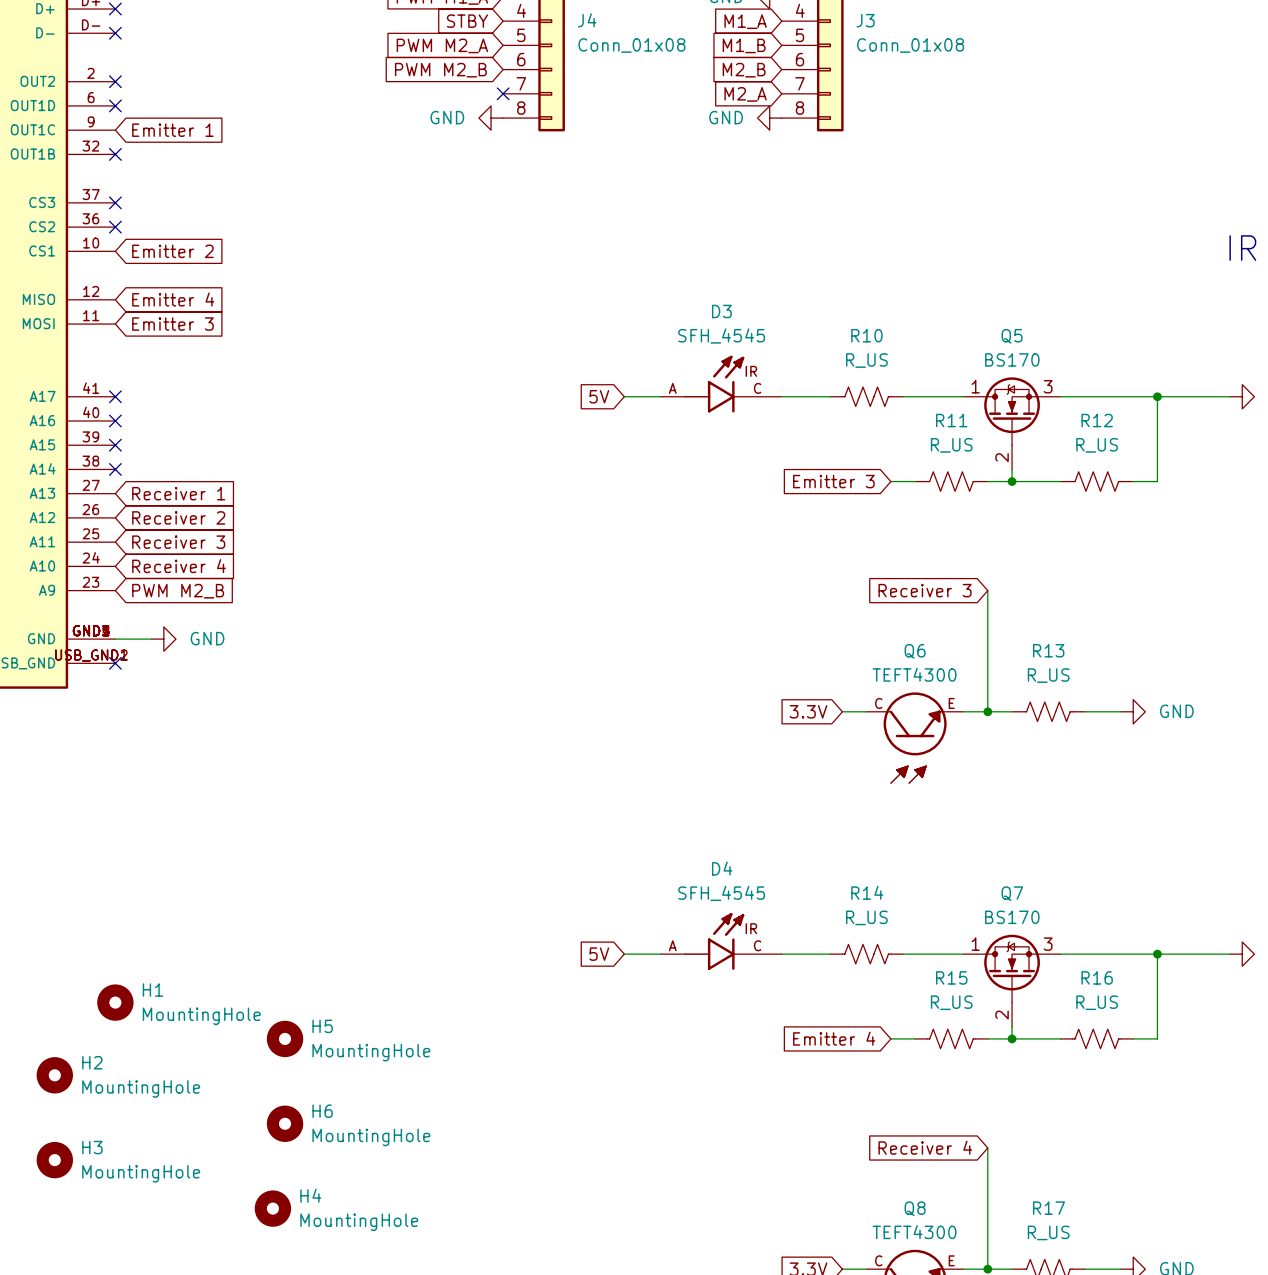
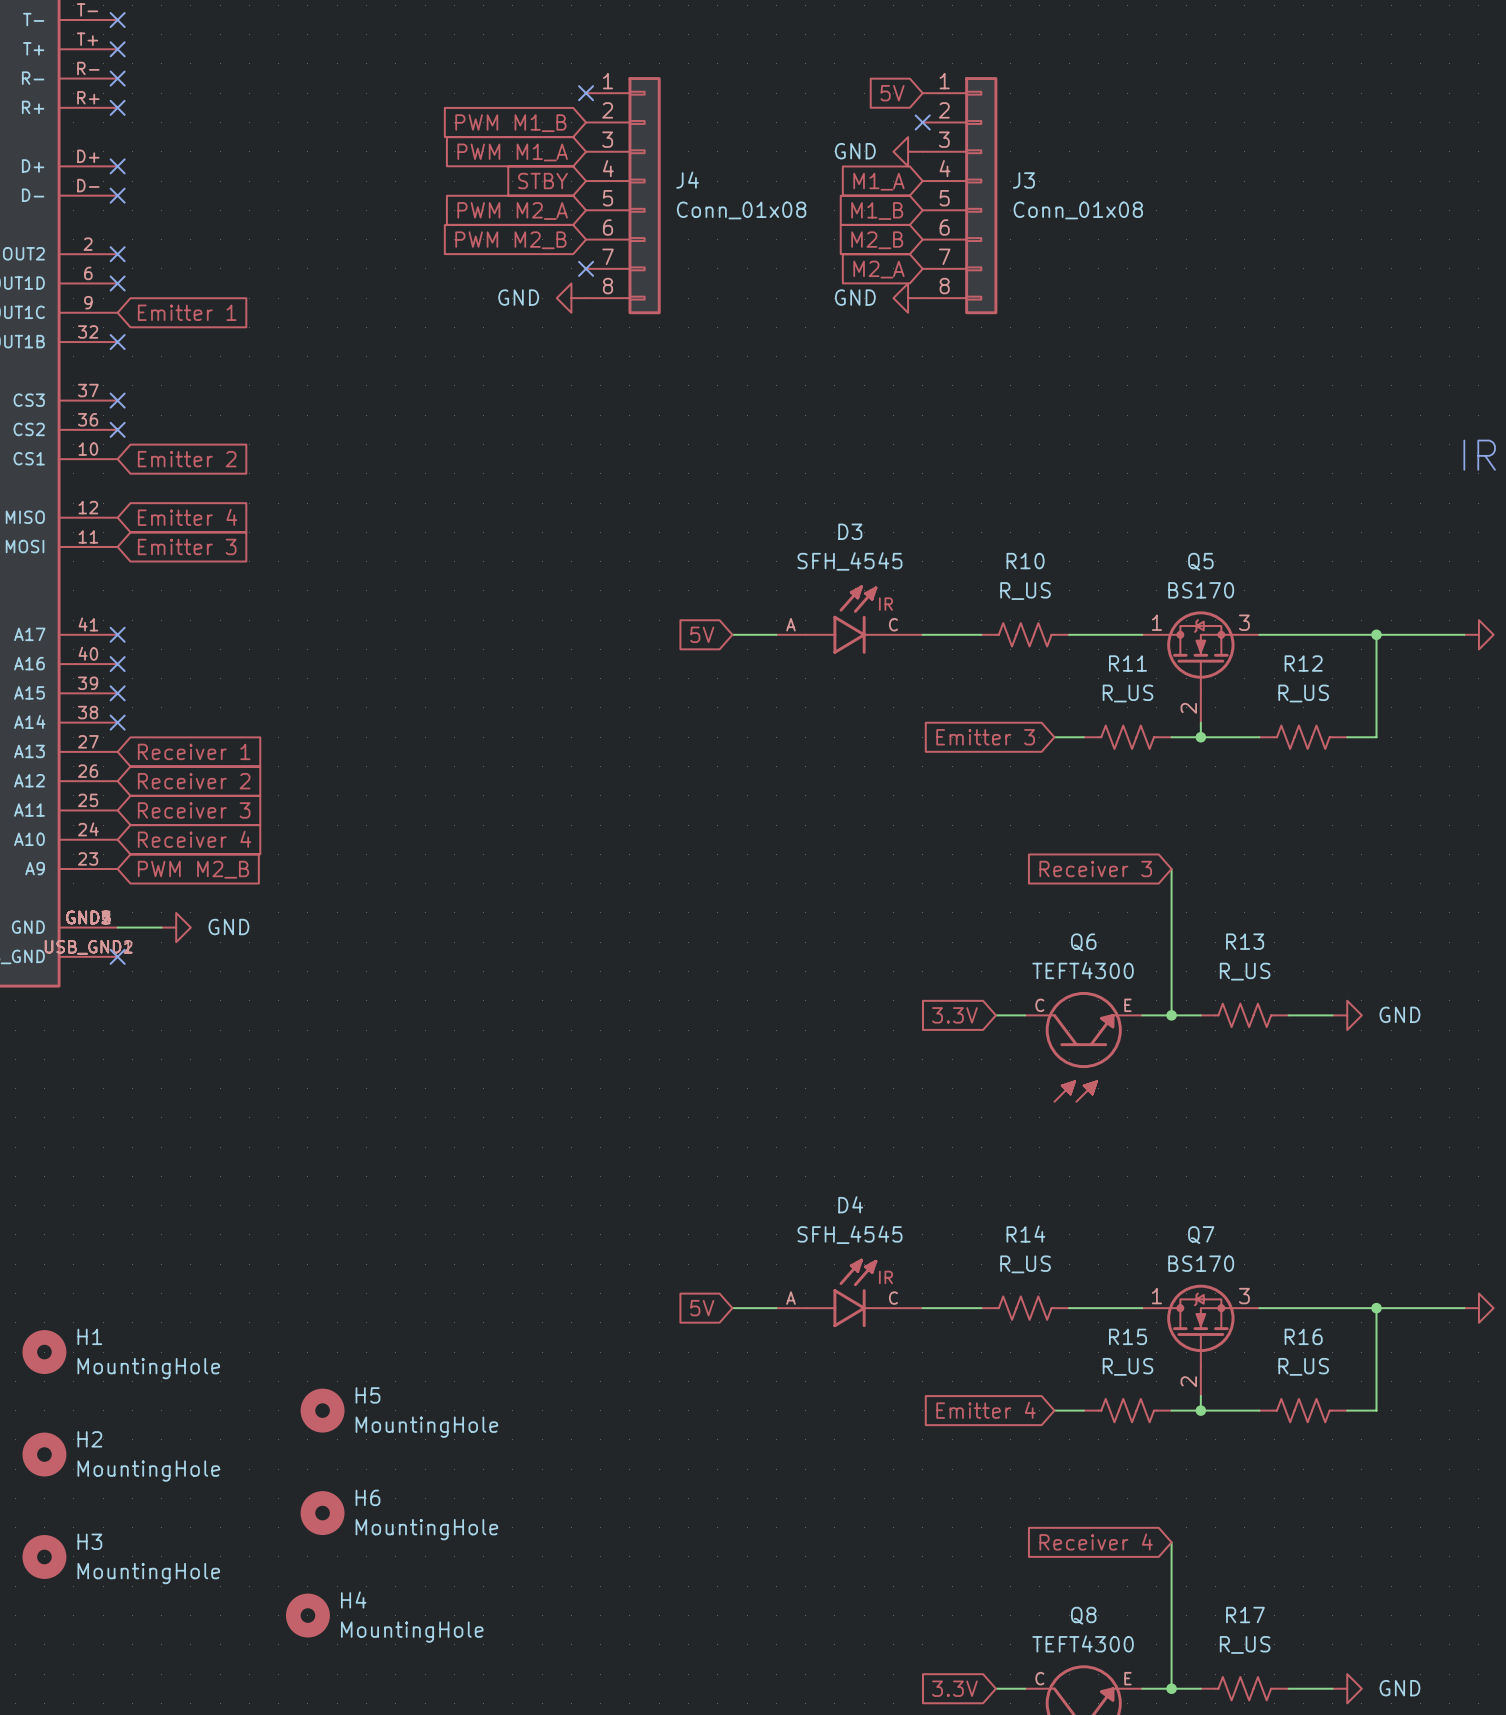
H1 position: (115, 1002) -> (44, 1352)

